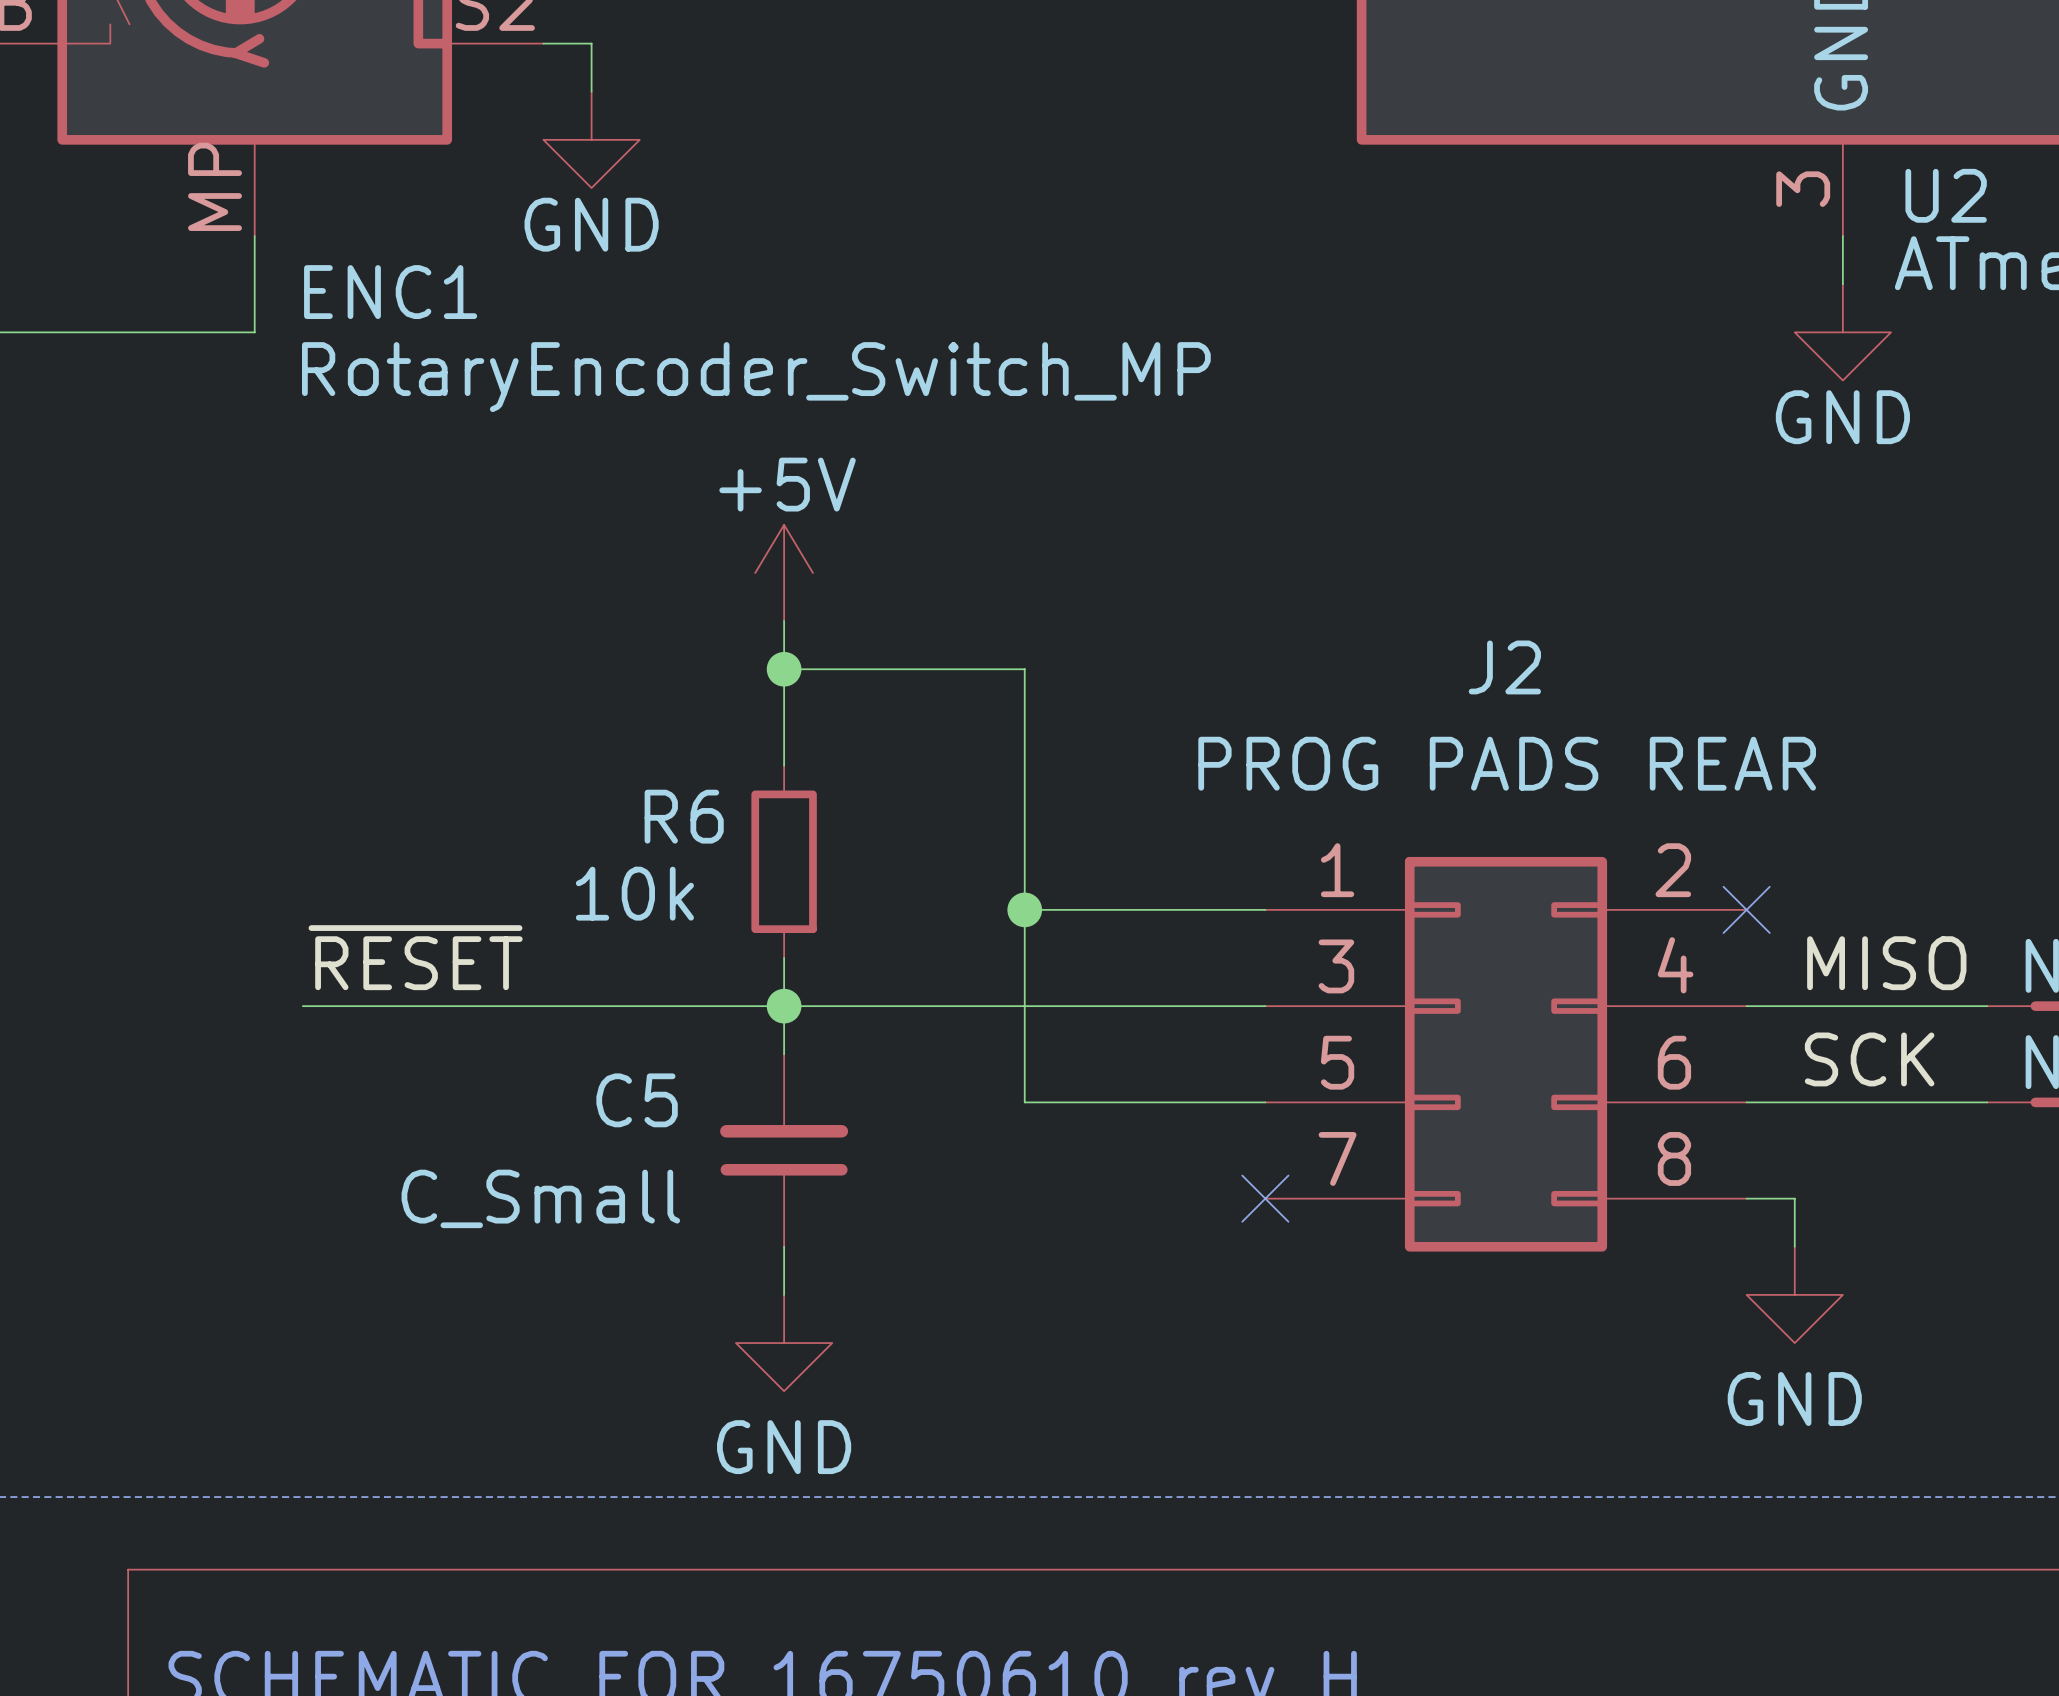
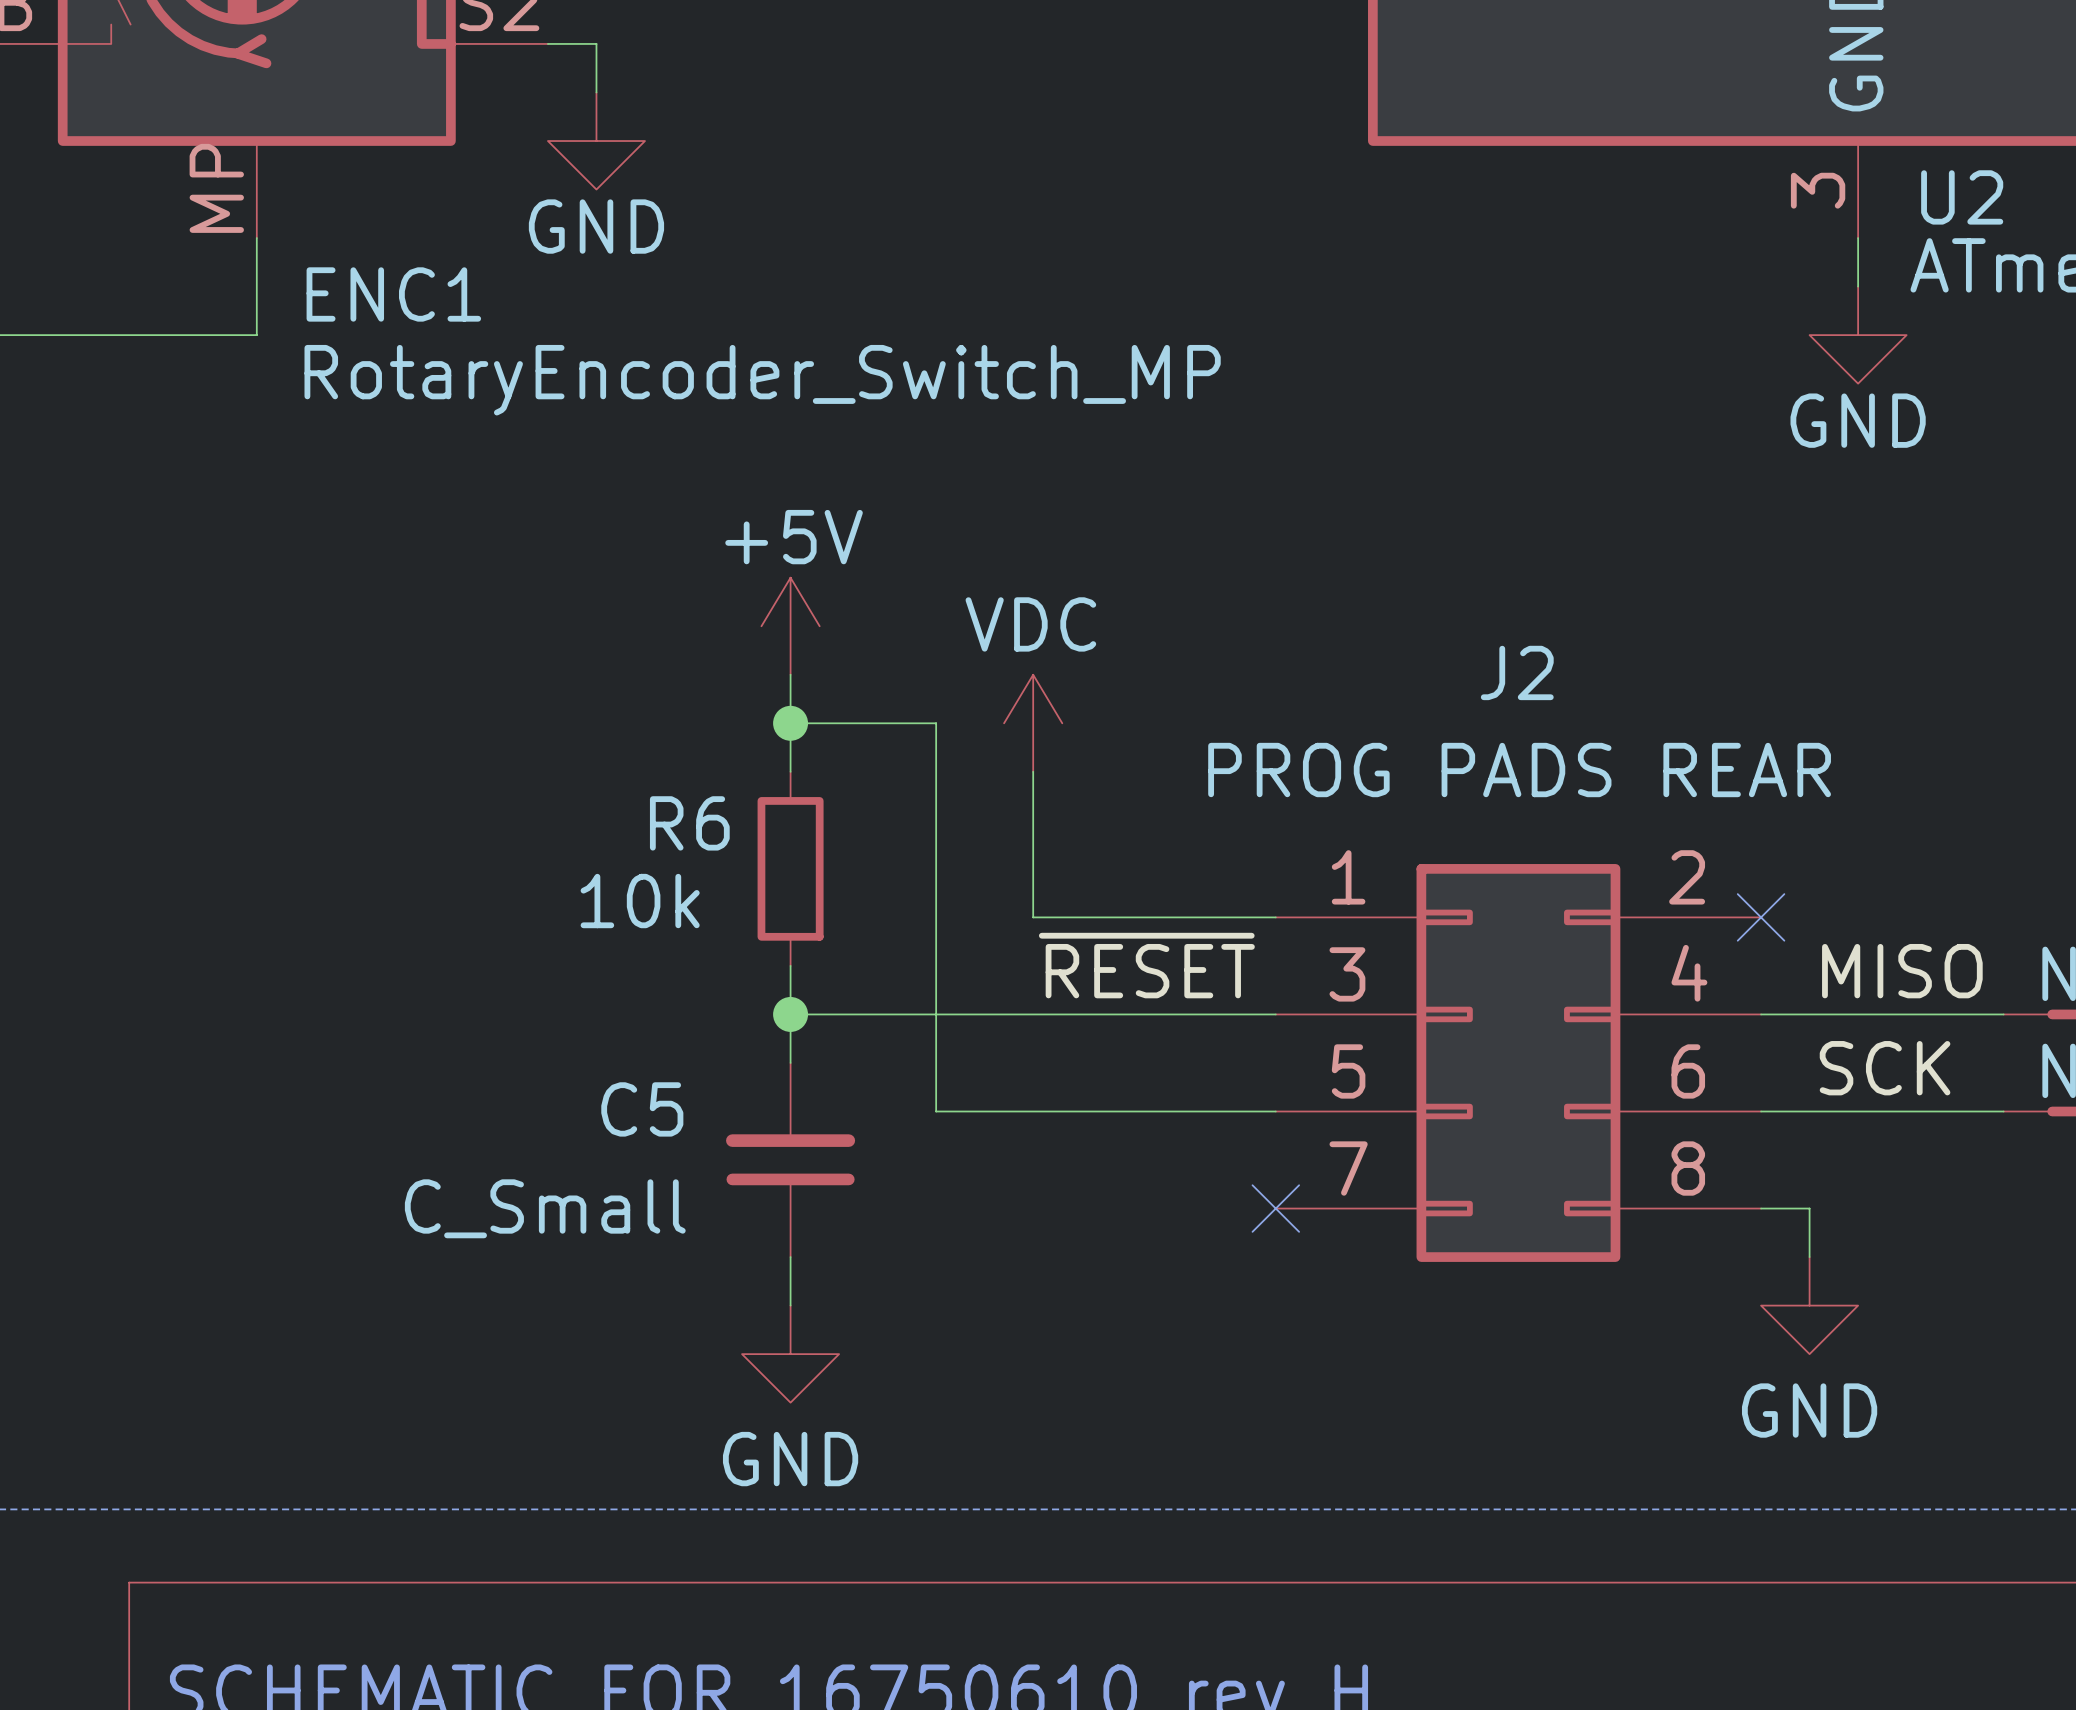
power symbol position: +5V (784, 573) -> +5V (790, 626)
wire: (784, 621) (784, 669) (1024, 669) (1024, 765) -> none
junction position: (784, 669) -> (790, 723)
power symbol: none -> VDC (1033, 723)
wire: (1024, 909) (1024, 1102) -> (790, 723) (936, 723) (936, 1111) (1033, 1111)
junction: (1024, 909) -> none
label position: ~{RESET} (415, 957) -> ~{RESET} (1146, 965)
wire: (302, 1006) (784, 1006) -> none

